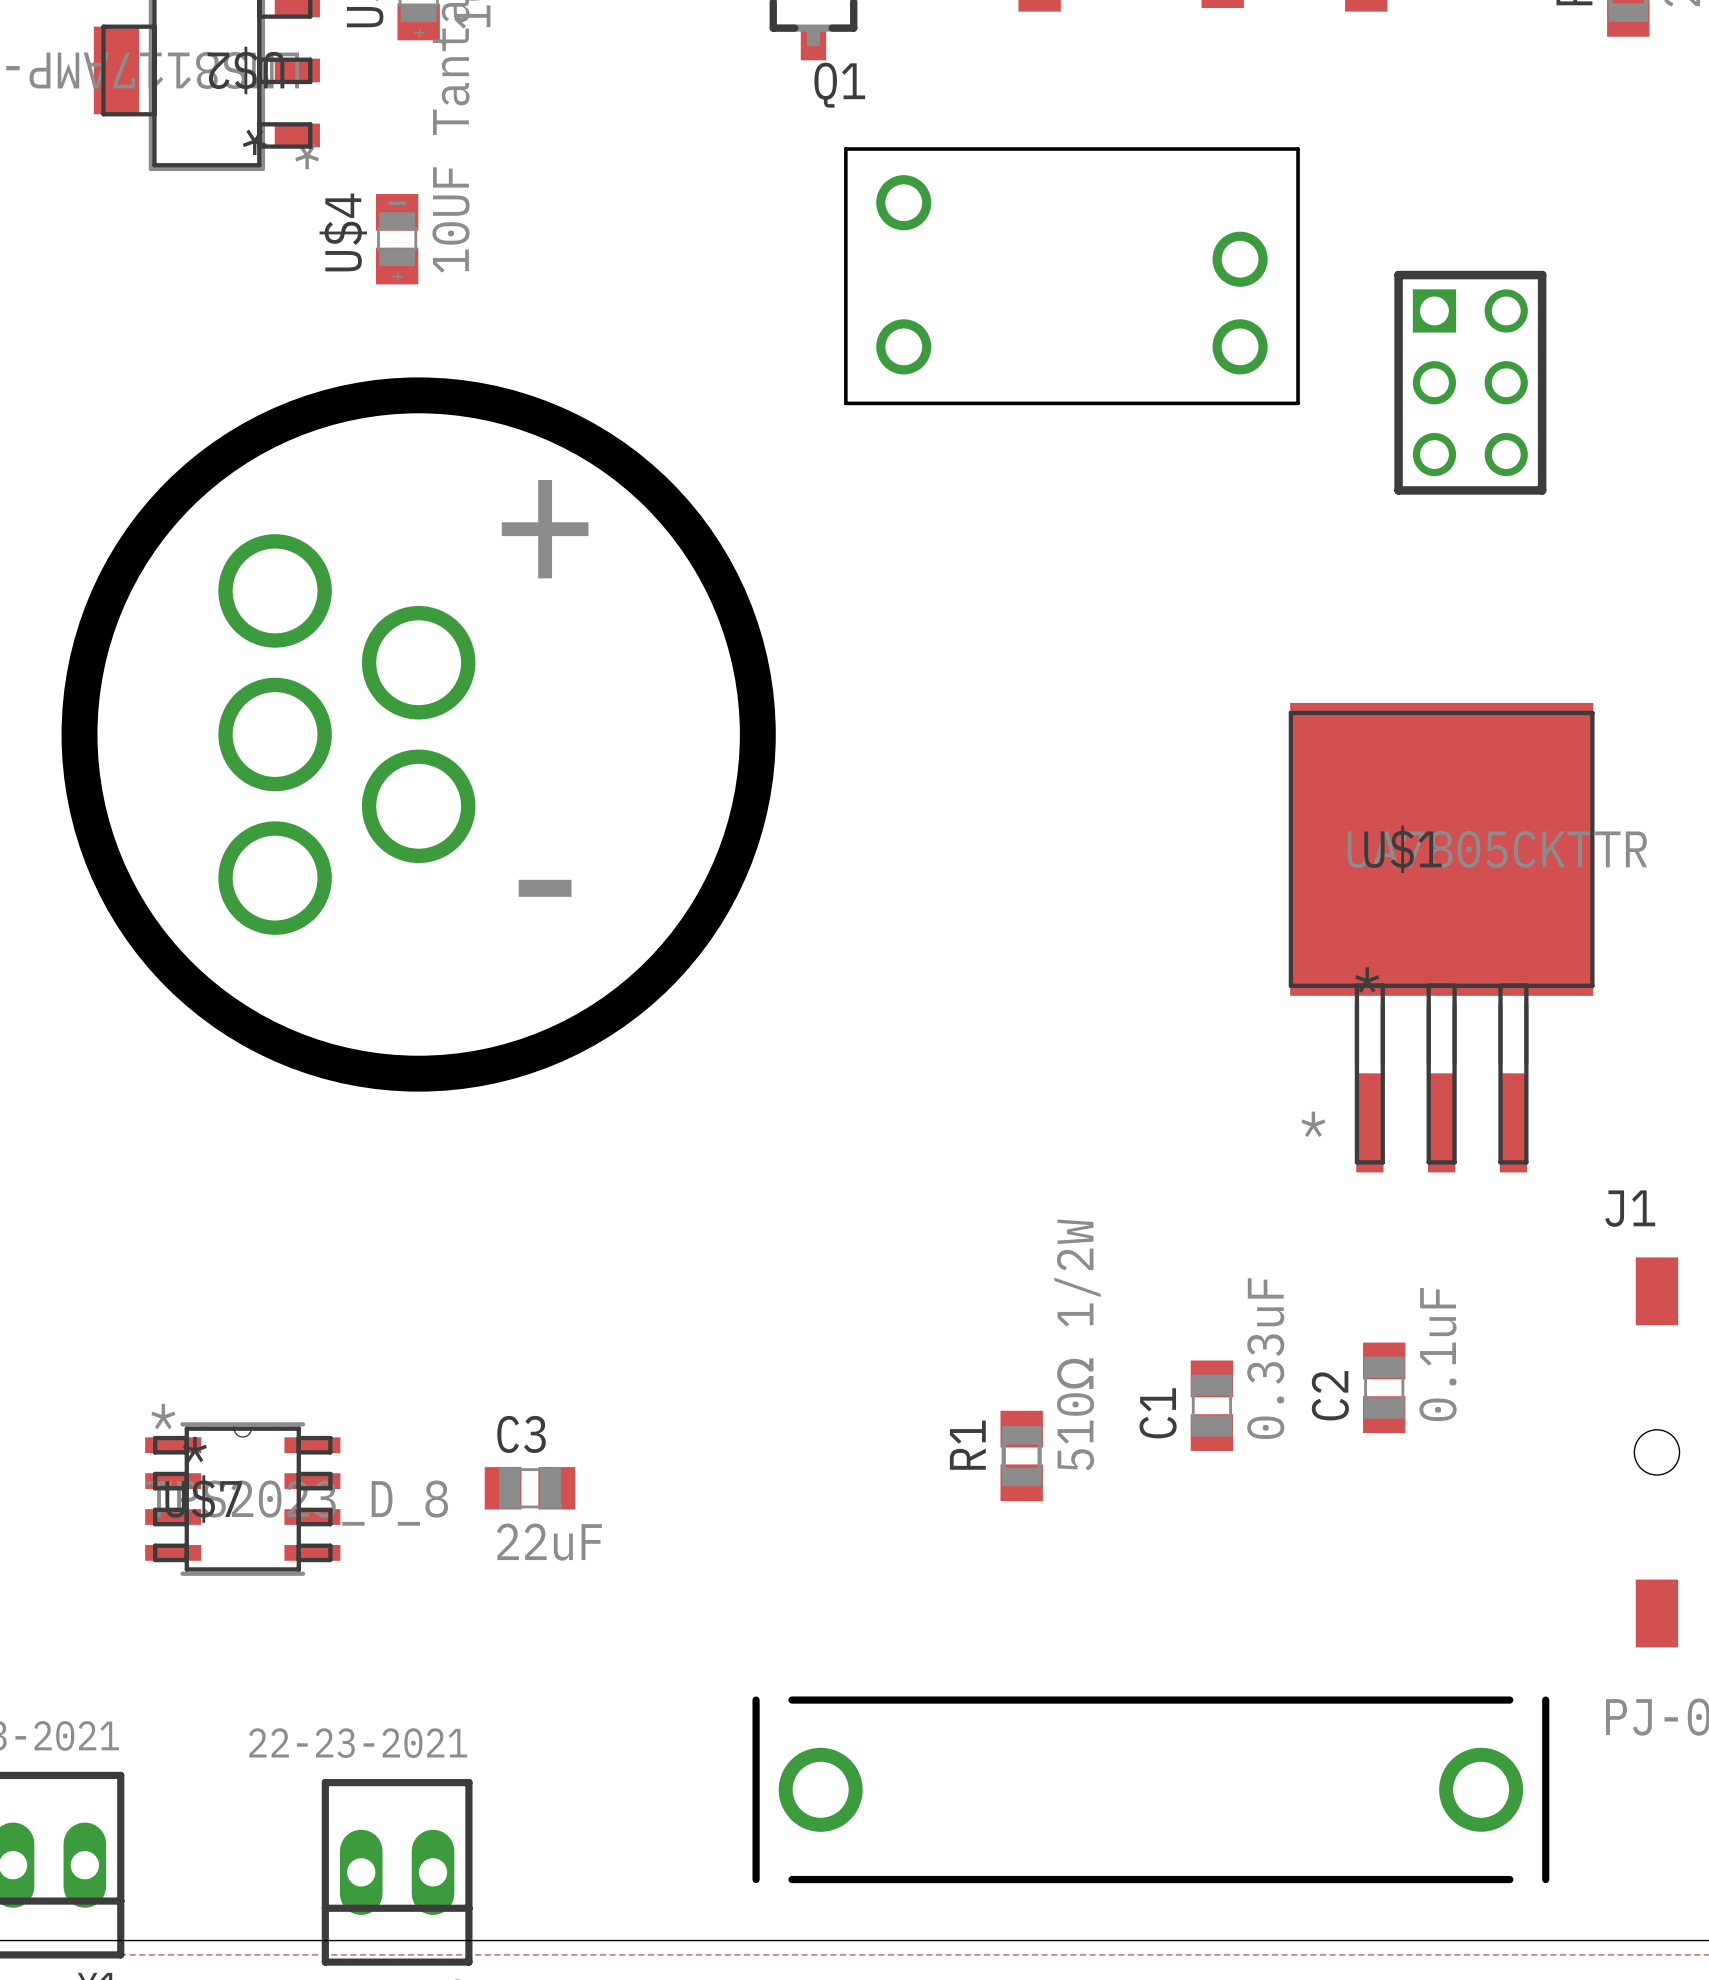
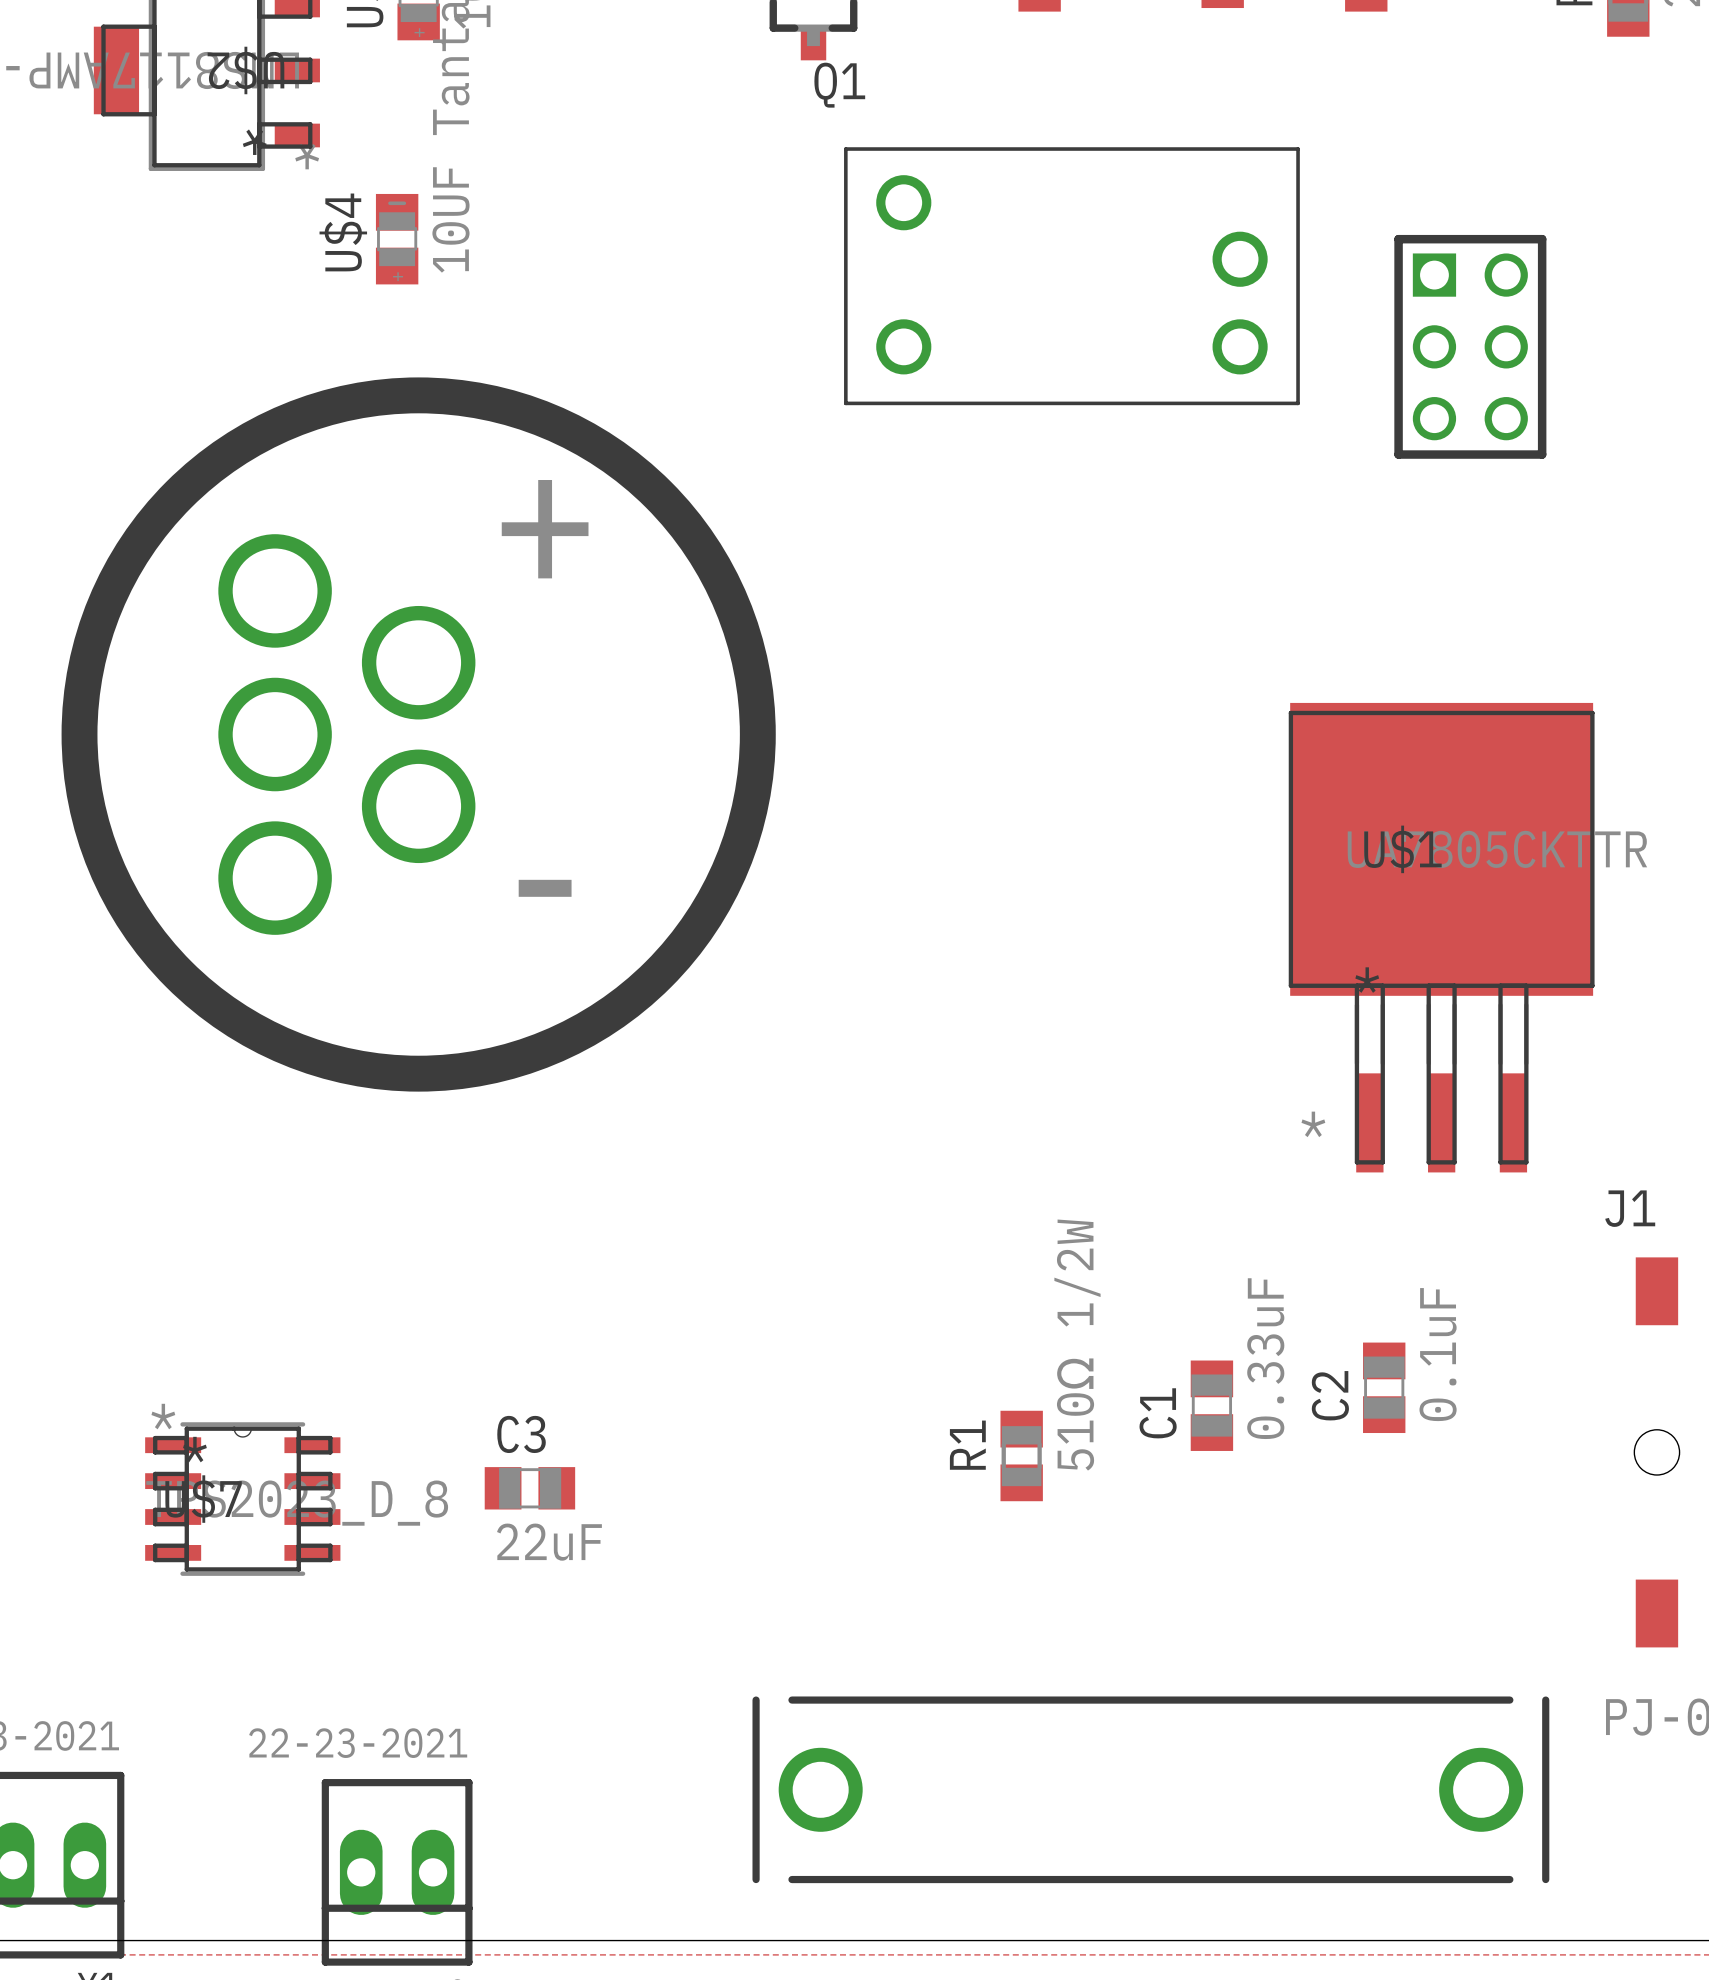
part footprint: [844, 147, 1300, 406] -> [844, 147, 1300, 406]
part footprint: [61, 377, 776, 1092] -> [61, 377, 776, 1092]
part position: (1470, 382) -> (1470, 346)
part footprint: [752, 1696, 1550, 1884] -> [752, 1696, 1550, 1884]

